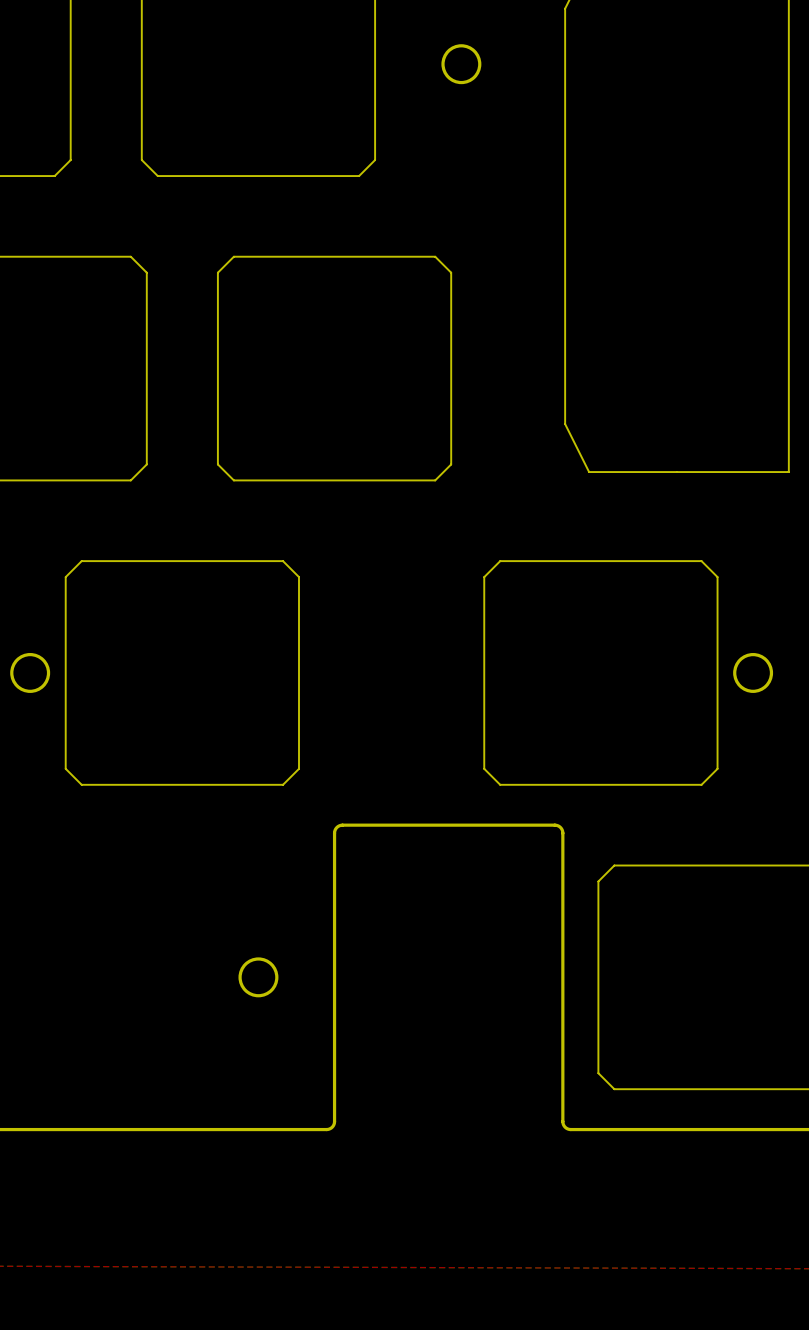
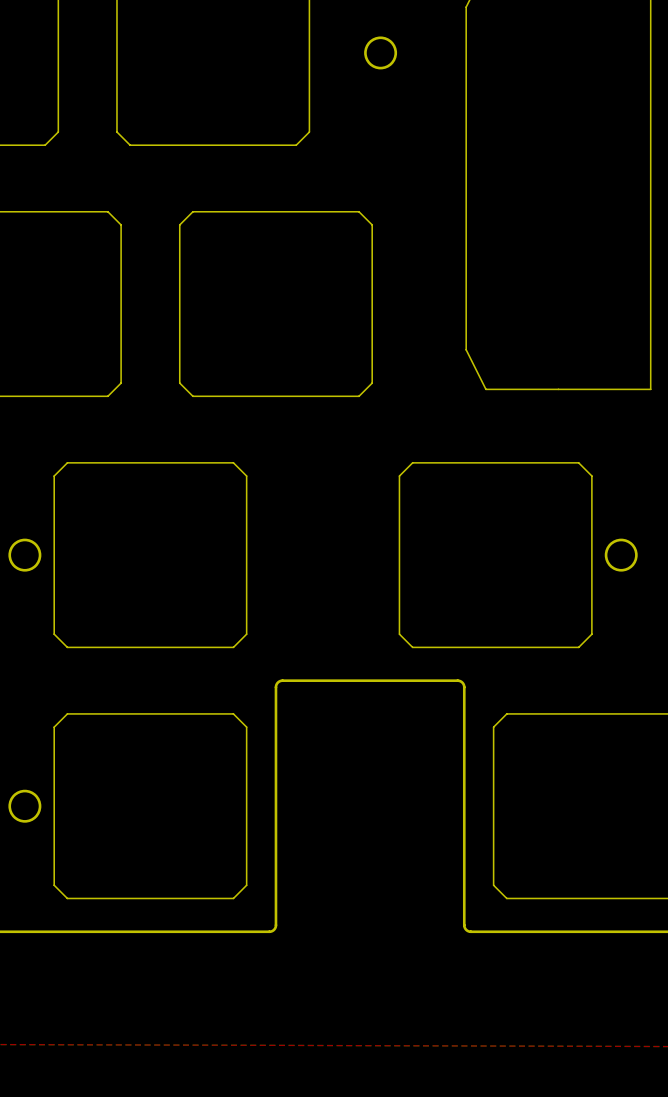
drawing: none -> [53, 713, 248, 900]
round board edge position: (258, 977) -> (24, 806)

